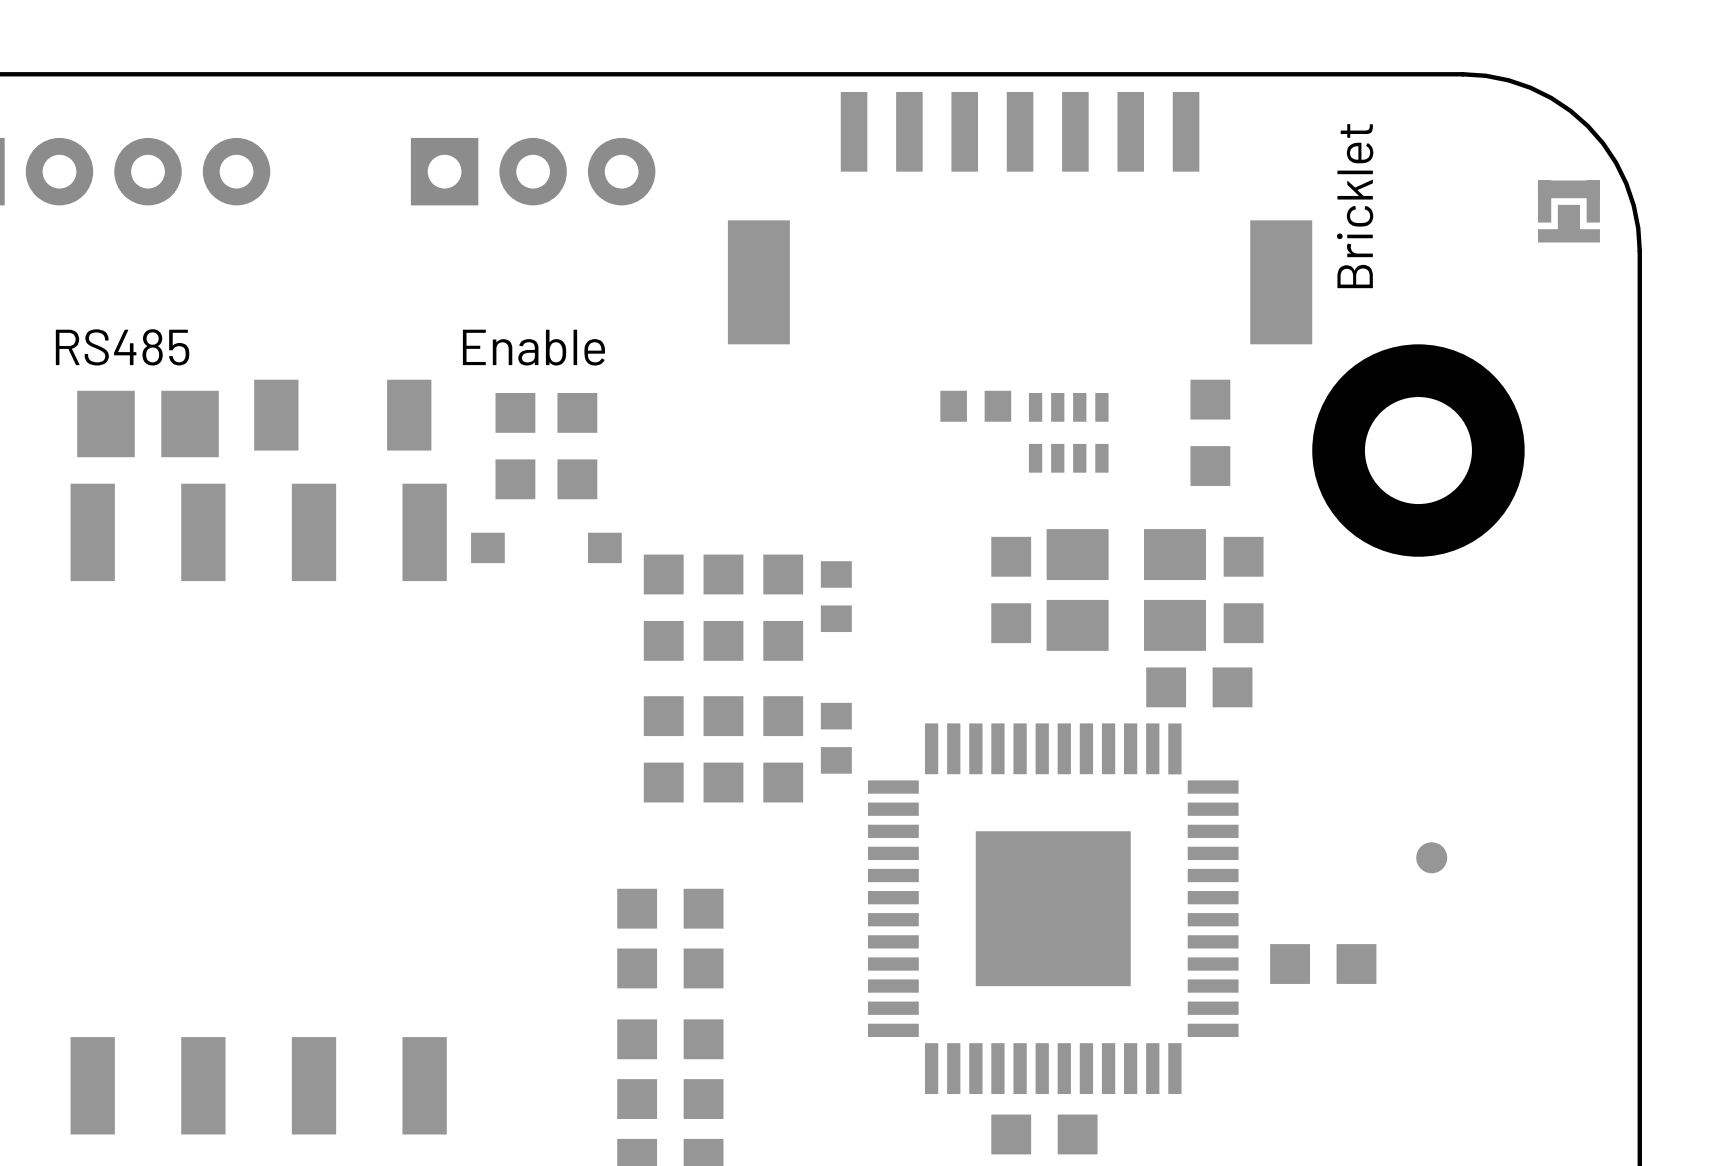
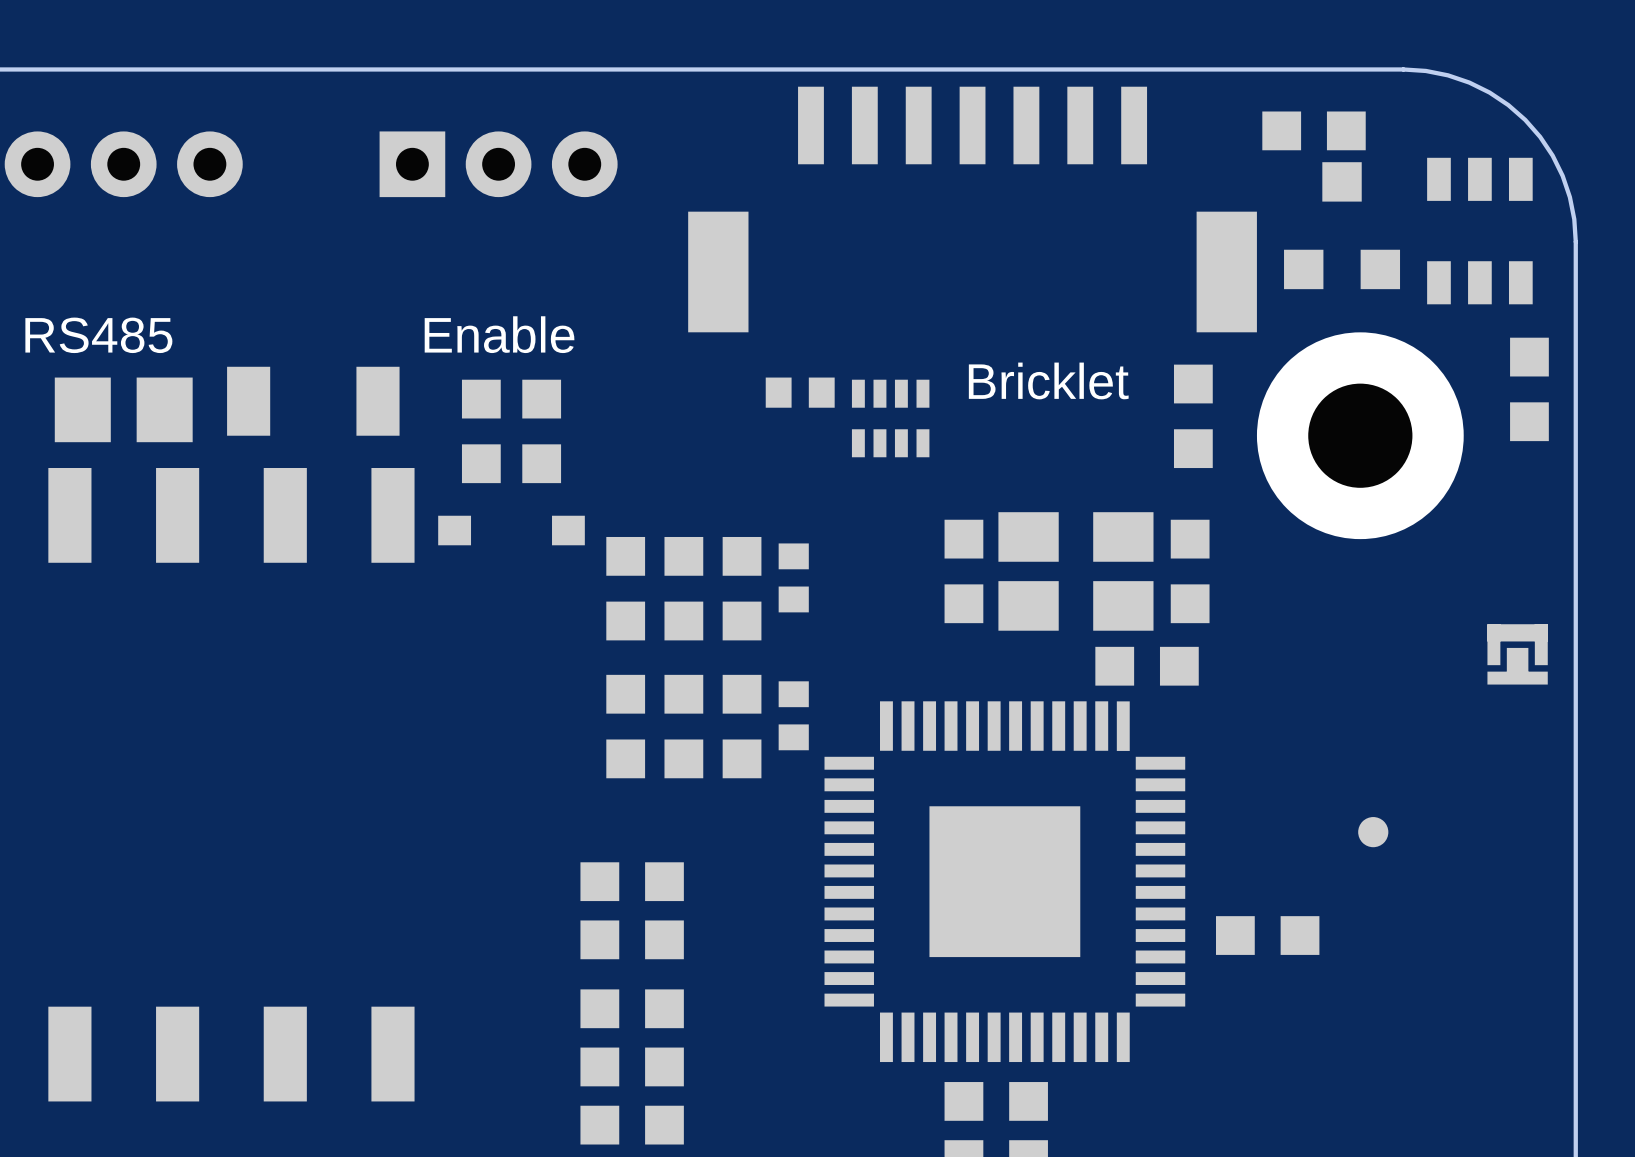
part: none -> (1314, 130)
part footprint: [1537, 180, 1600, 243] -> [1427, 157, 1533, 305]
text rotation: 0° (1355, 206) -> 90° clockwise (1048, 380)
text position: Bricklet (1355, 206) -> Bricklet (1048, 380)
part: none -> (1342, 225)
part: none -> (1529, 389)
part position: (975, 406) -> (800, 392)
part position: (1068, 432) -> (890, 418)
part position: (1210, 432) -> (1193, 416)
part: none -> (1517, 654)

